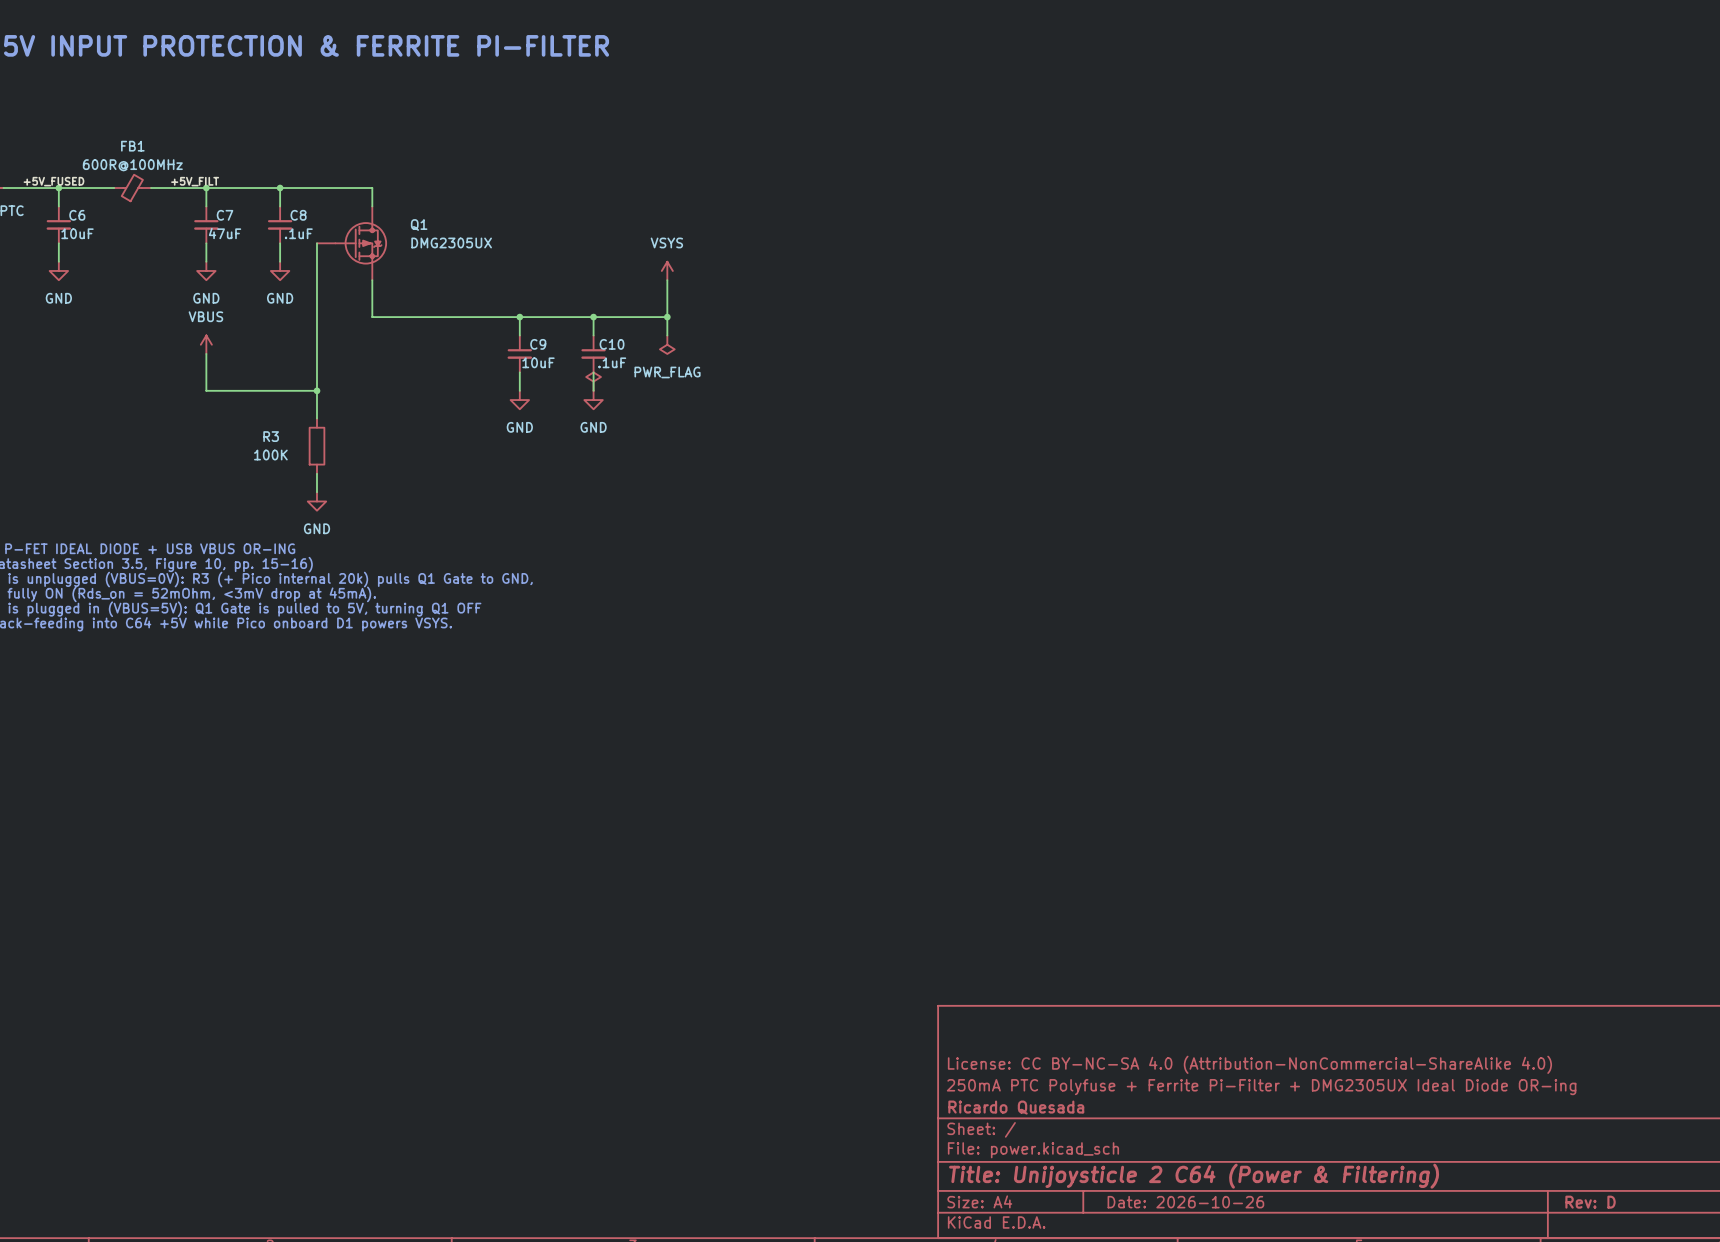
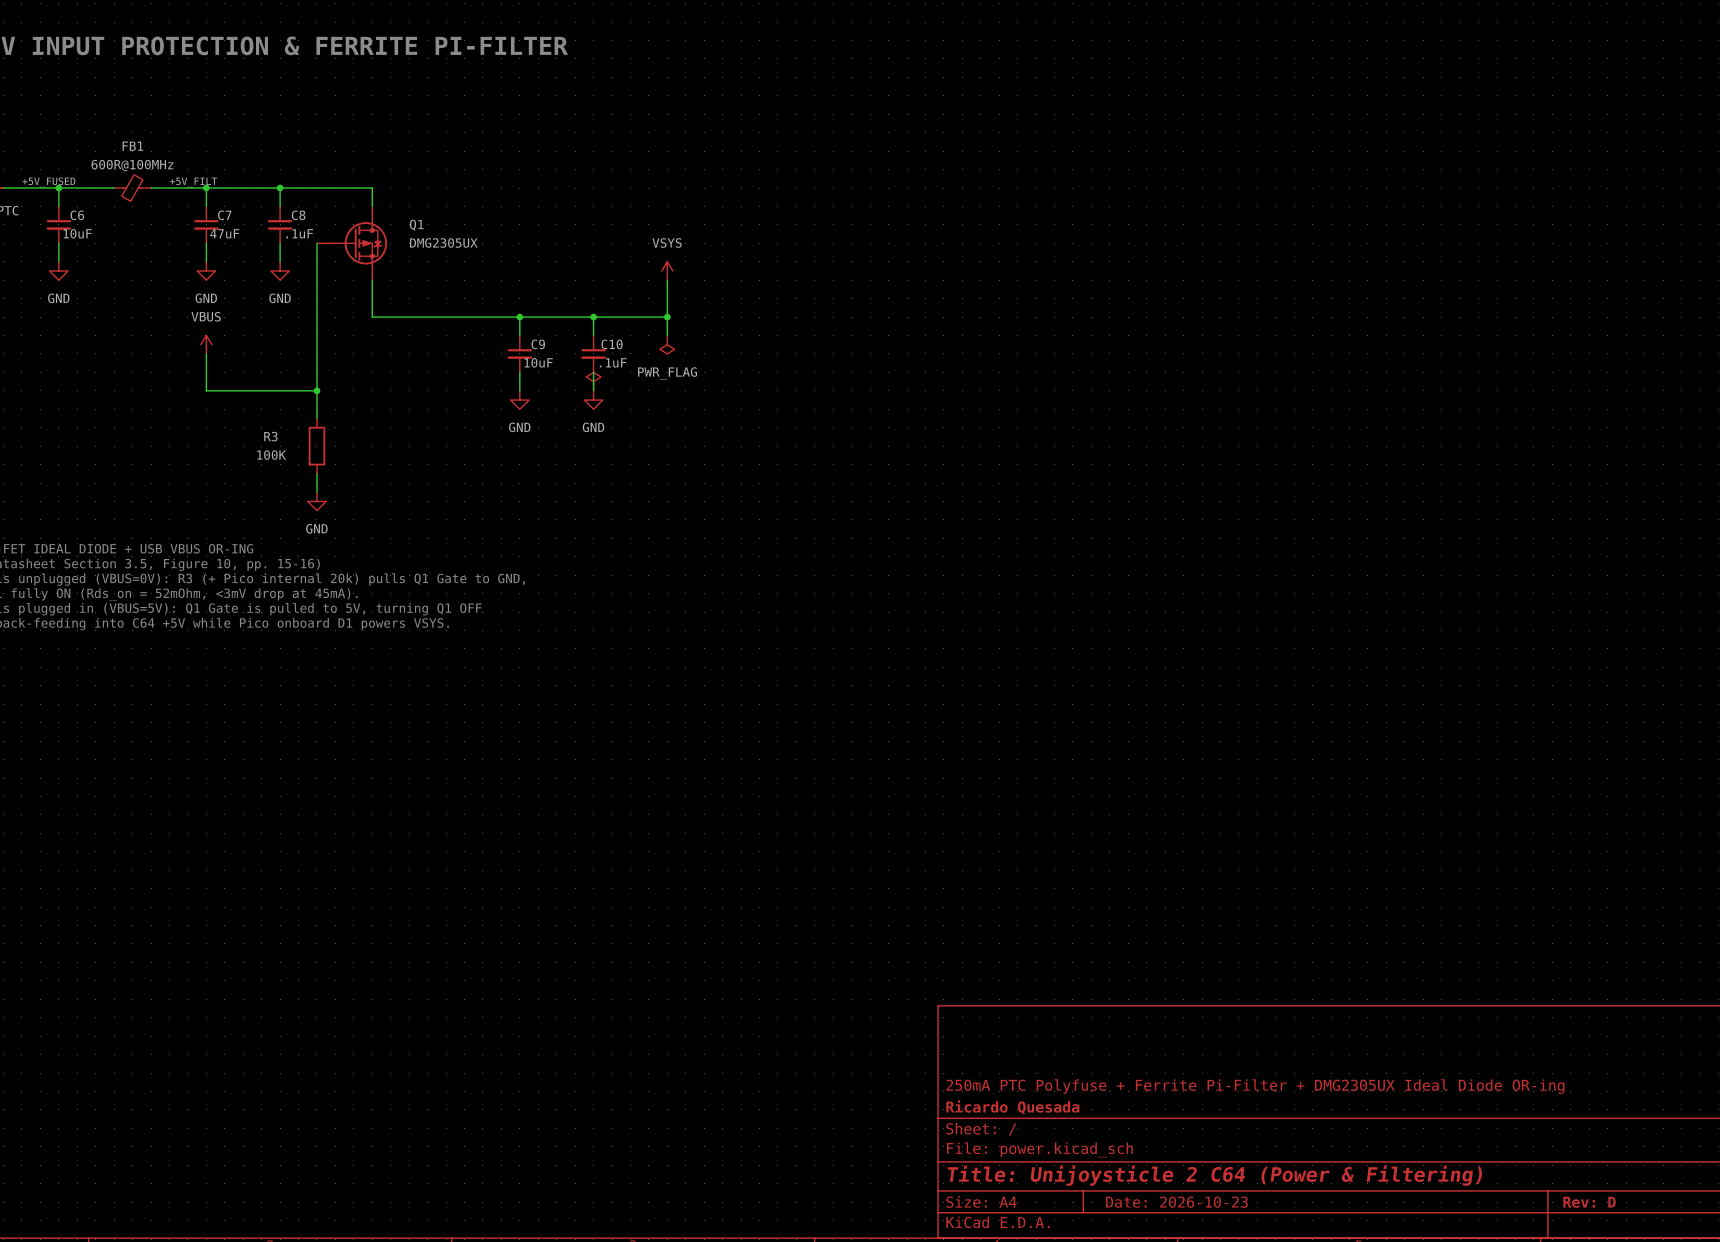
title block: License: CC BY-NC-SA 4.0 (Attribution-NonCommercial-ShareAlike 4.0) (1249, 1064) -> none
title block: Date: 2026-10-26 (1185, 1202) -> Date: 2026-10-23 (1176, 1202)

